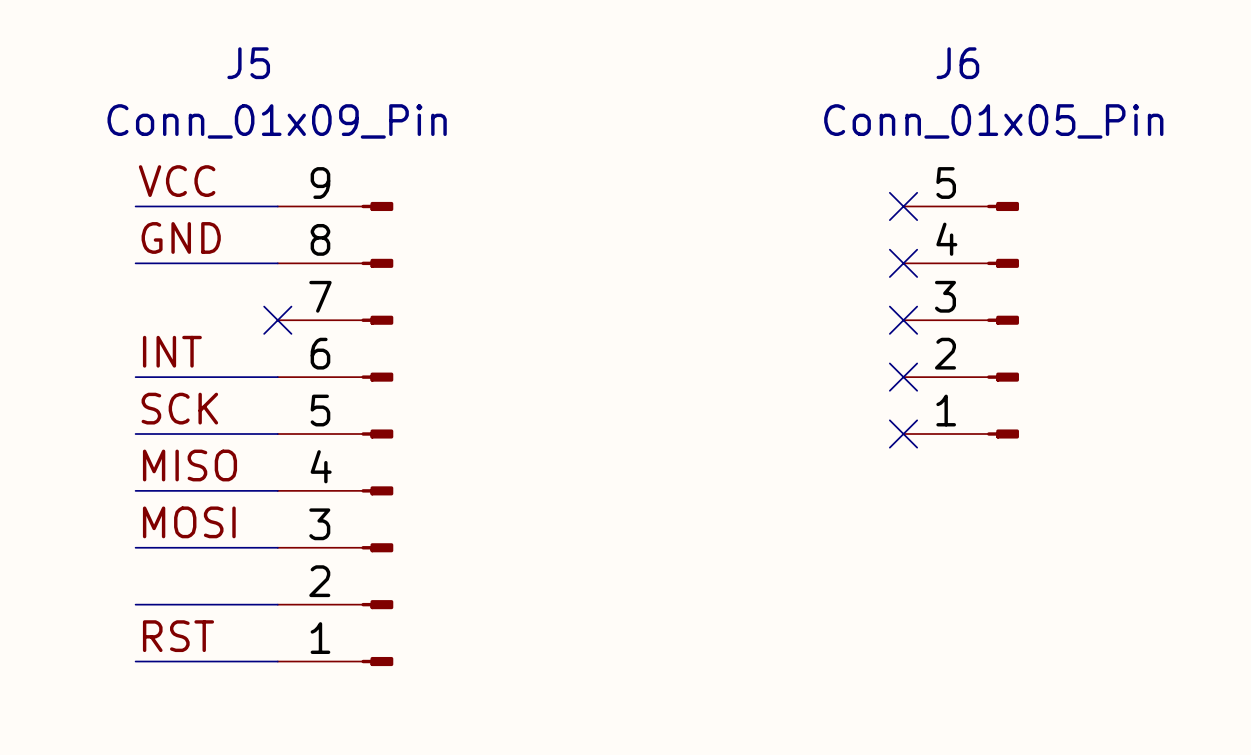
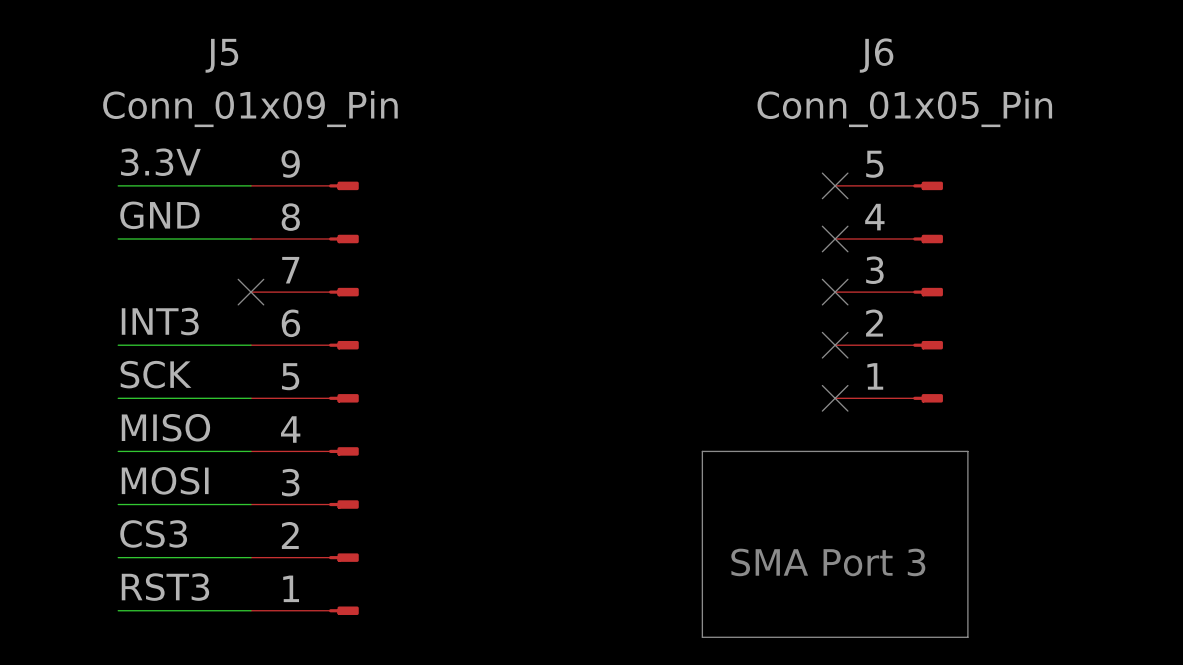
label: VCC (177, 181) -> 3.3V (160, 162)
label: INT (172, 351) -> INT3 (160, 321)
line: none -> (702, 451) (967, 451) (967, 637) (702, 637) (702, 451)
label: none -> CS3 (153, 533)
text: none -> SMA Port 3 (828, 562)
label: RST (178, 636) -> RST3 (165, 587)

